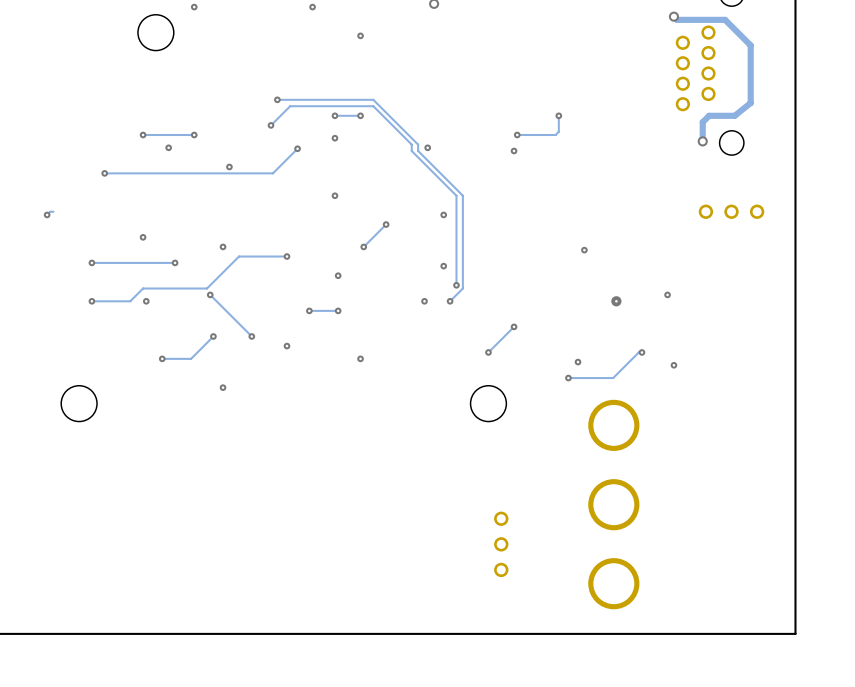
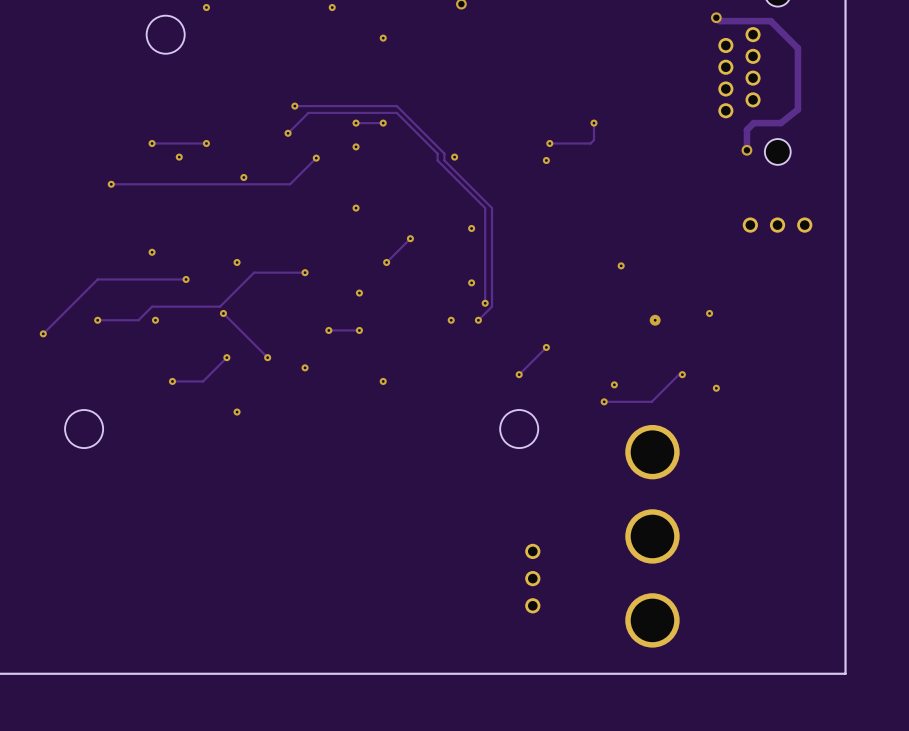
track: (53, 211) (47, 214) -> none
via: (47, 214) -> none
track: none -> (97, 279) (43, 333)
via: (91, 262) -> none
via: none -> (43, 333)

